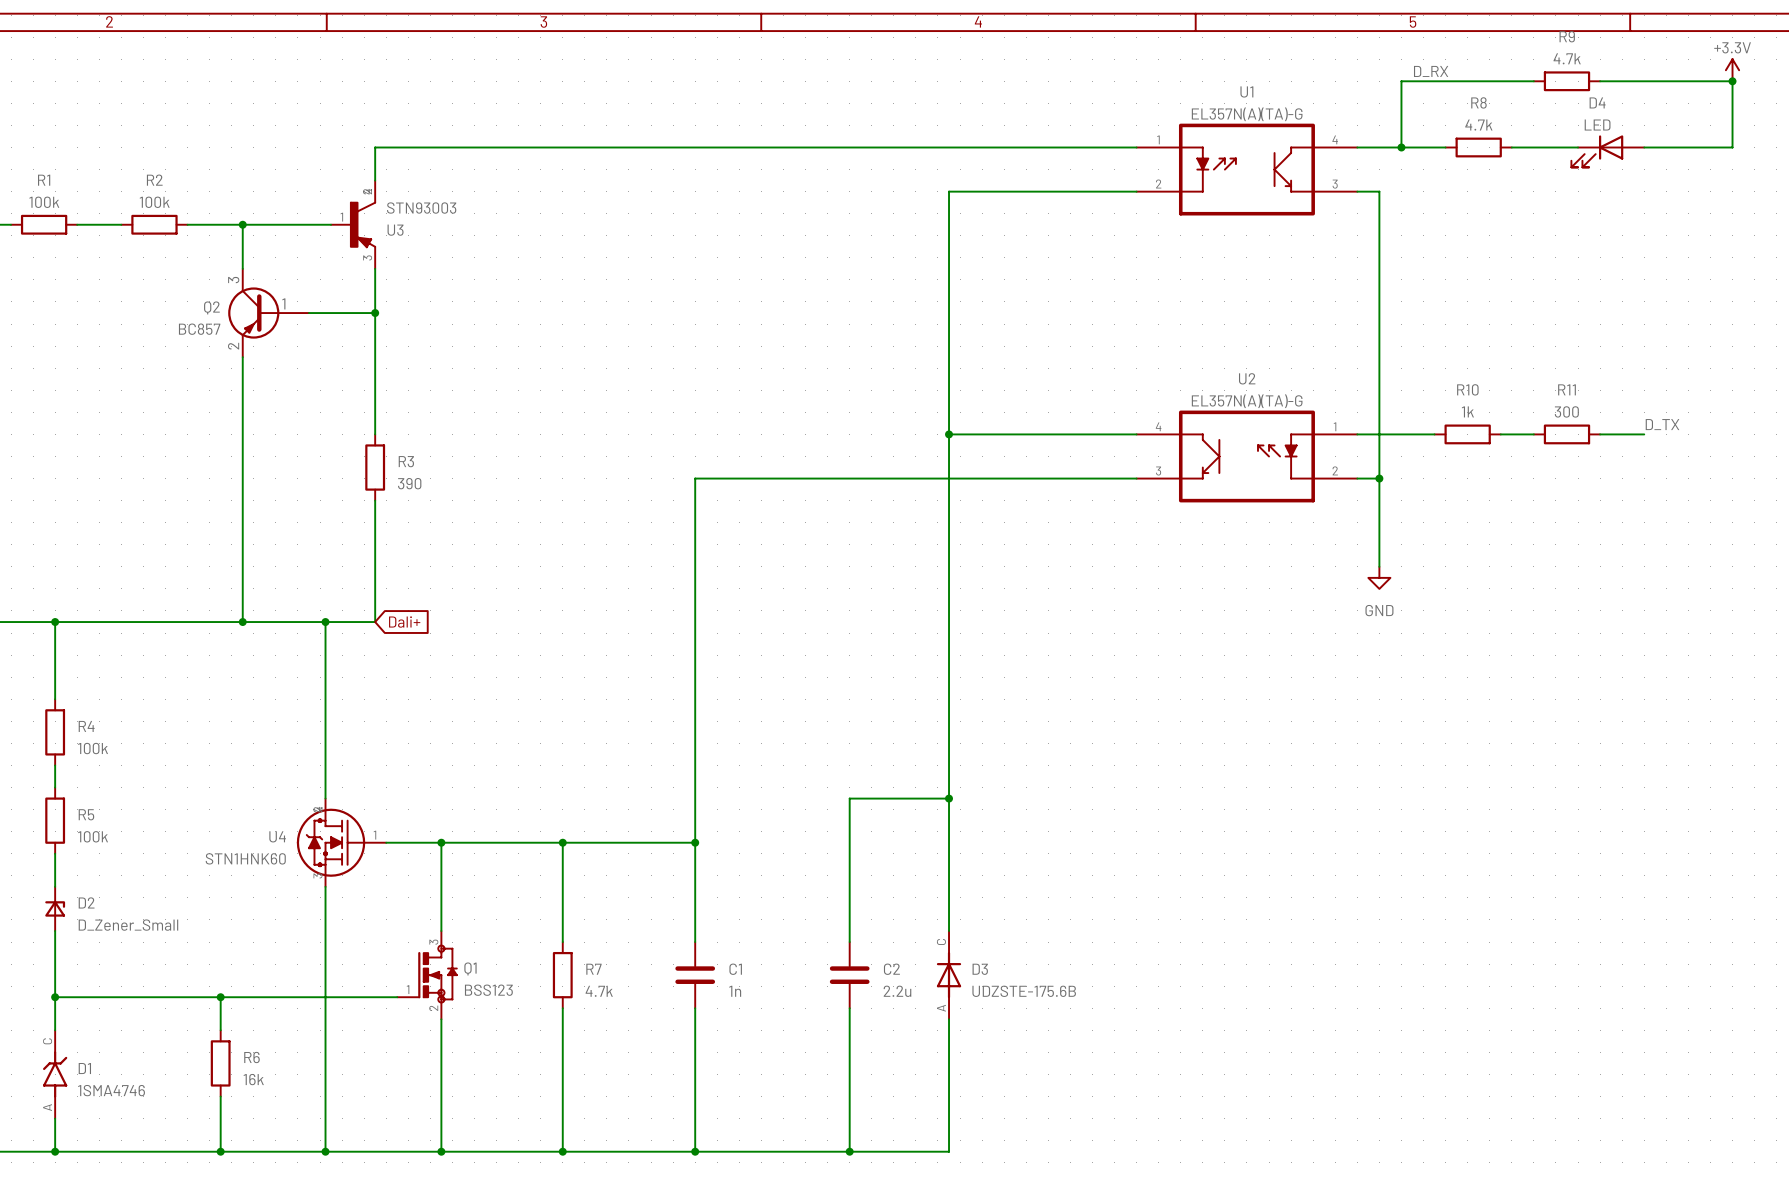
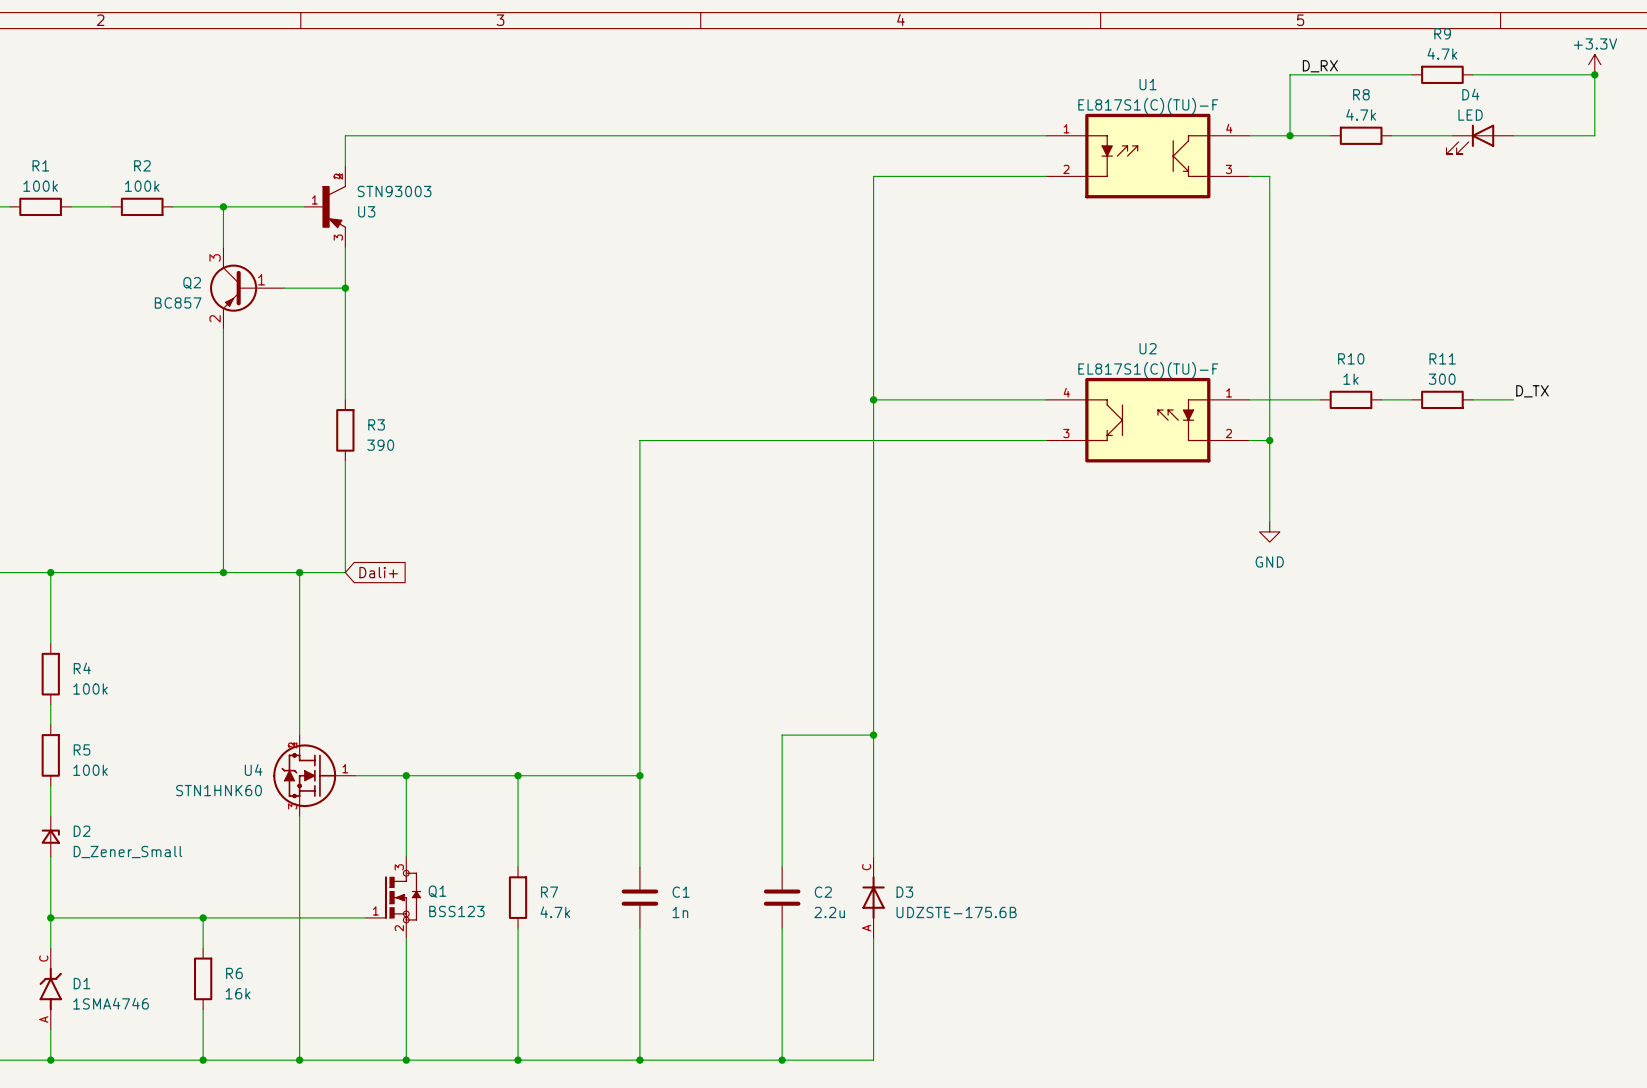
U1 value: EL357N(A)(TA)-G (1247, 114) -> EL817S1(C)(TU)-F (1148, 106)
U2 value: EL357N(A)(TA)-G (1247, 401) -> EL817S1(C)(TU)-F (1148, 370)

